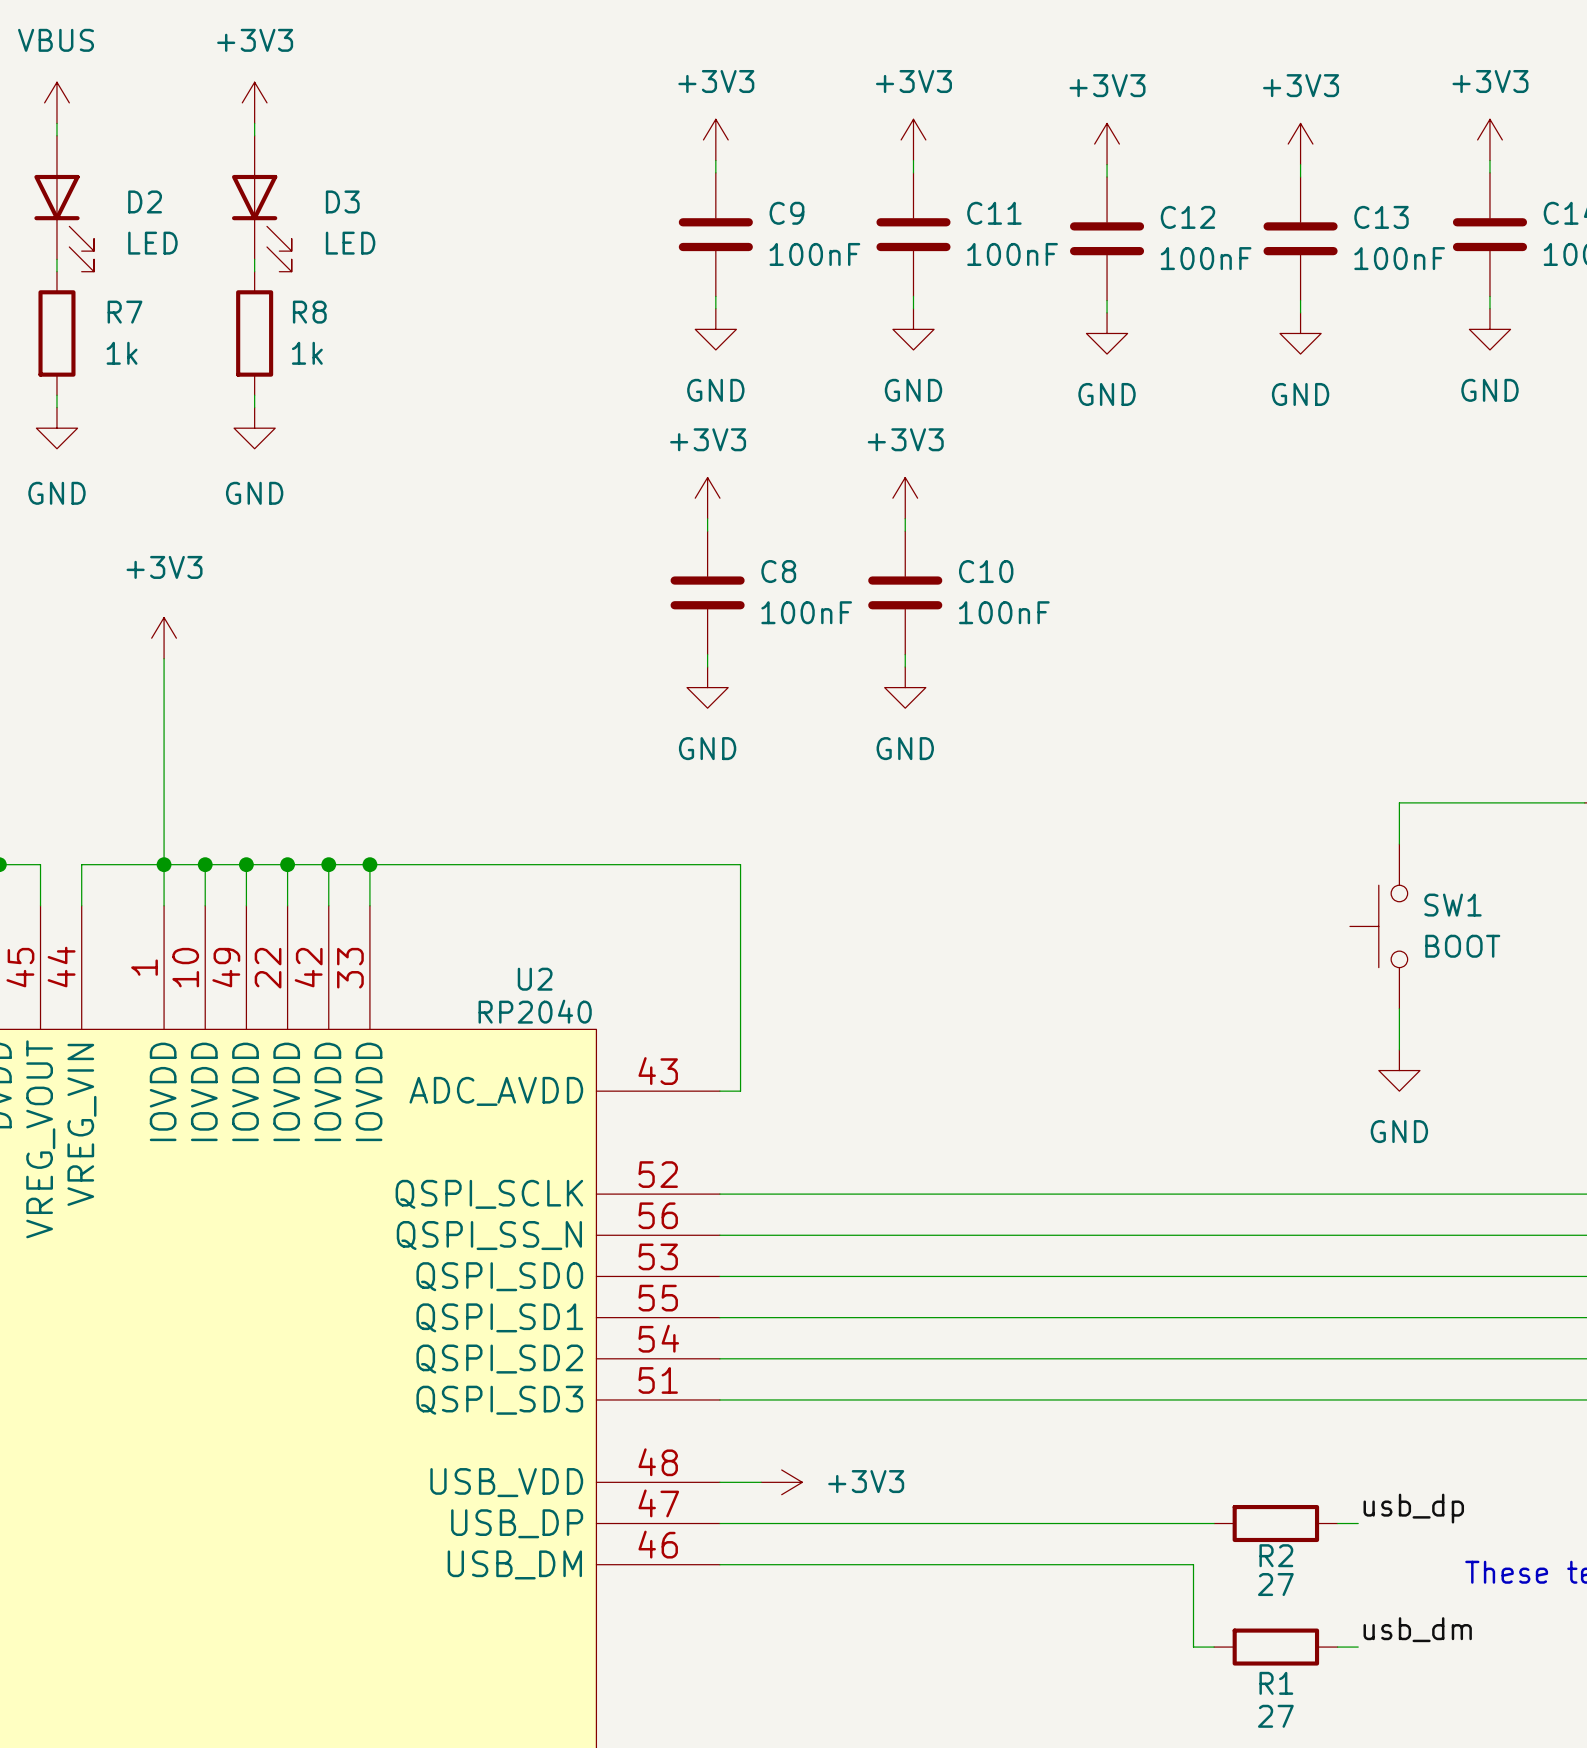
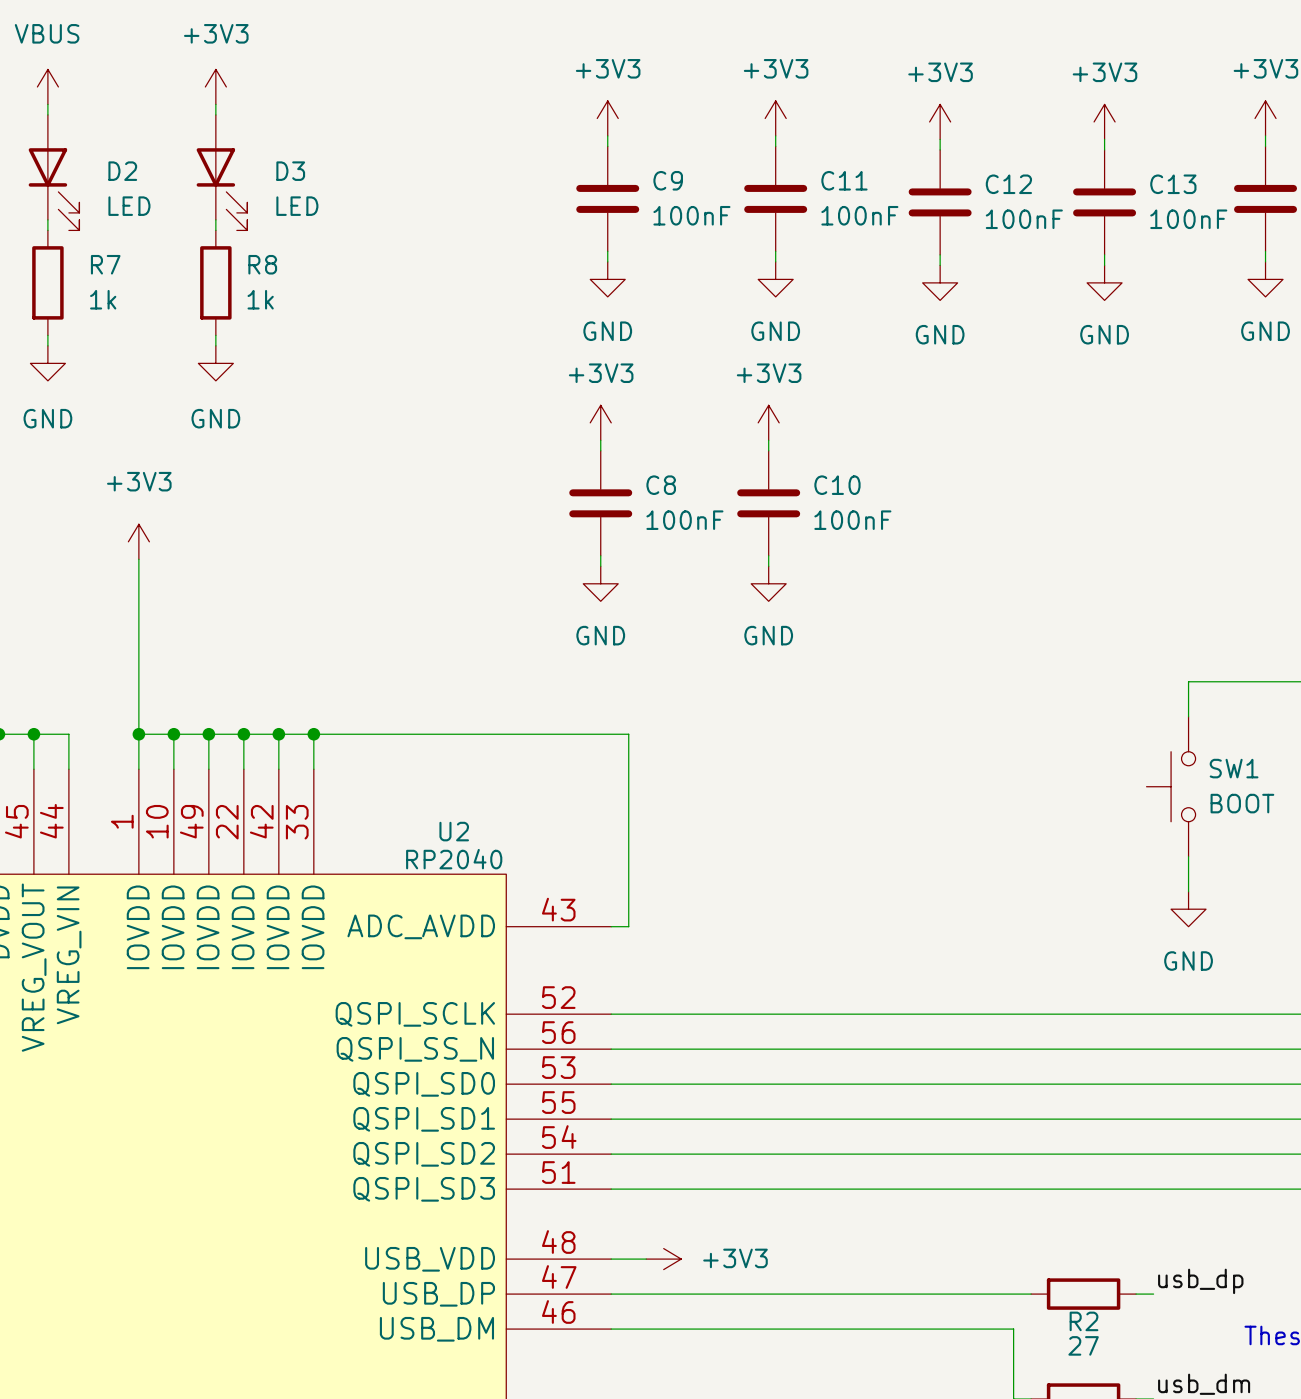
junction: none -> (33, 734)
wire: (81, 864) (164, 864) -> (68, 734) (33, 734)

